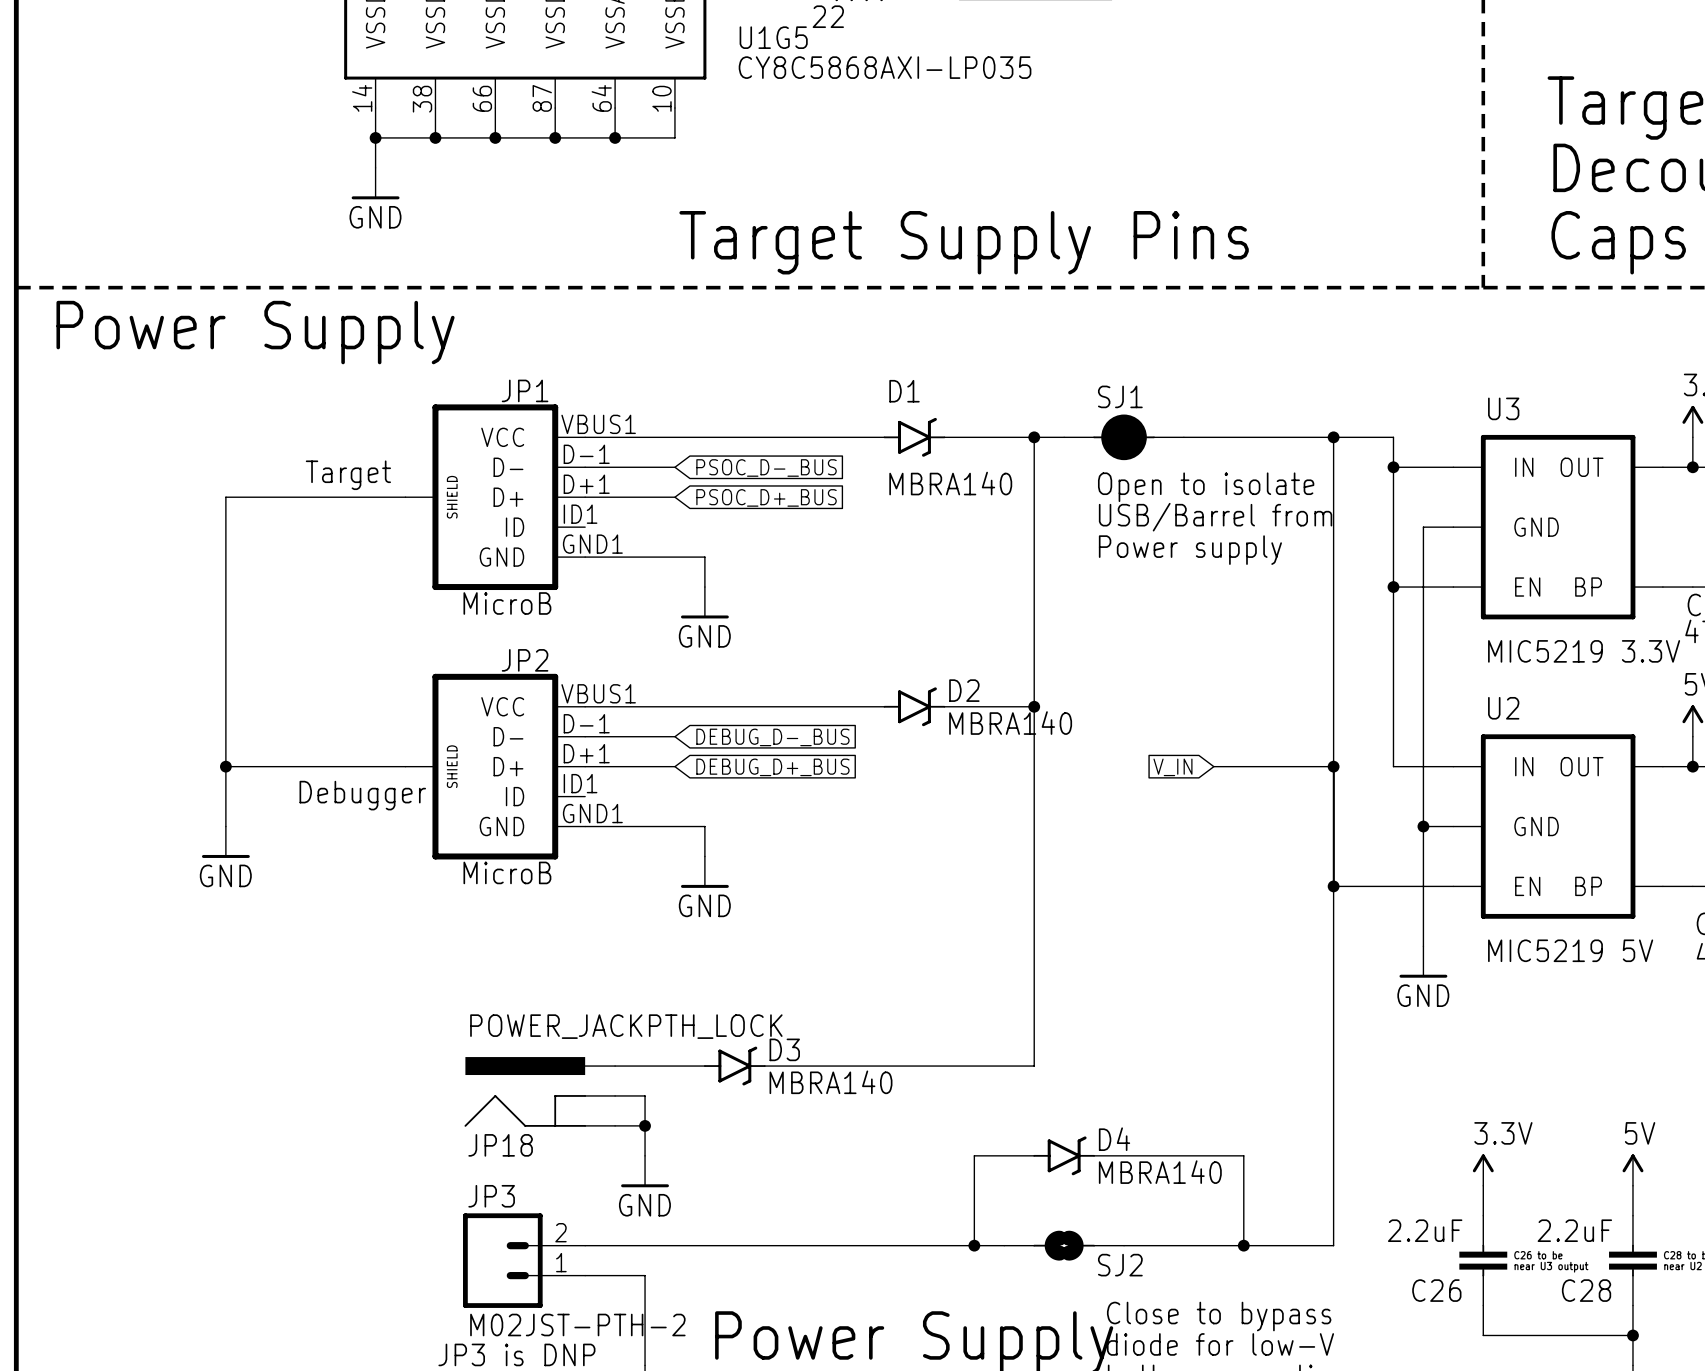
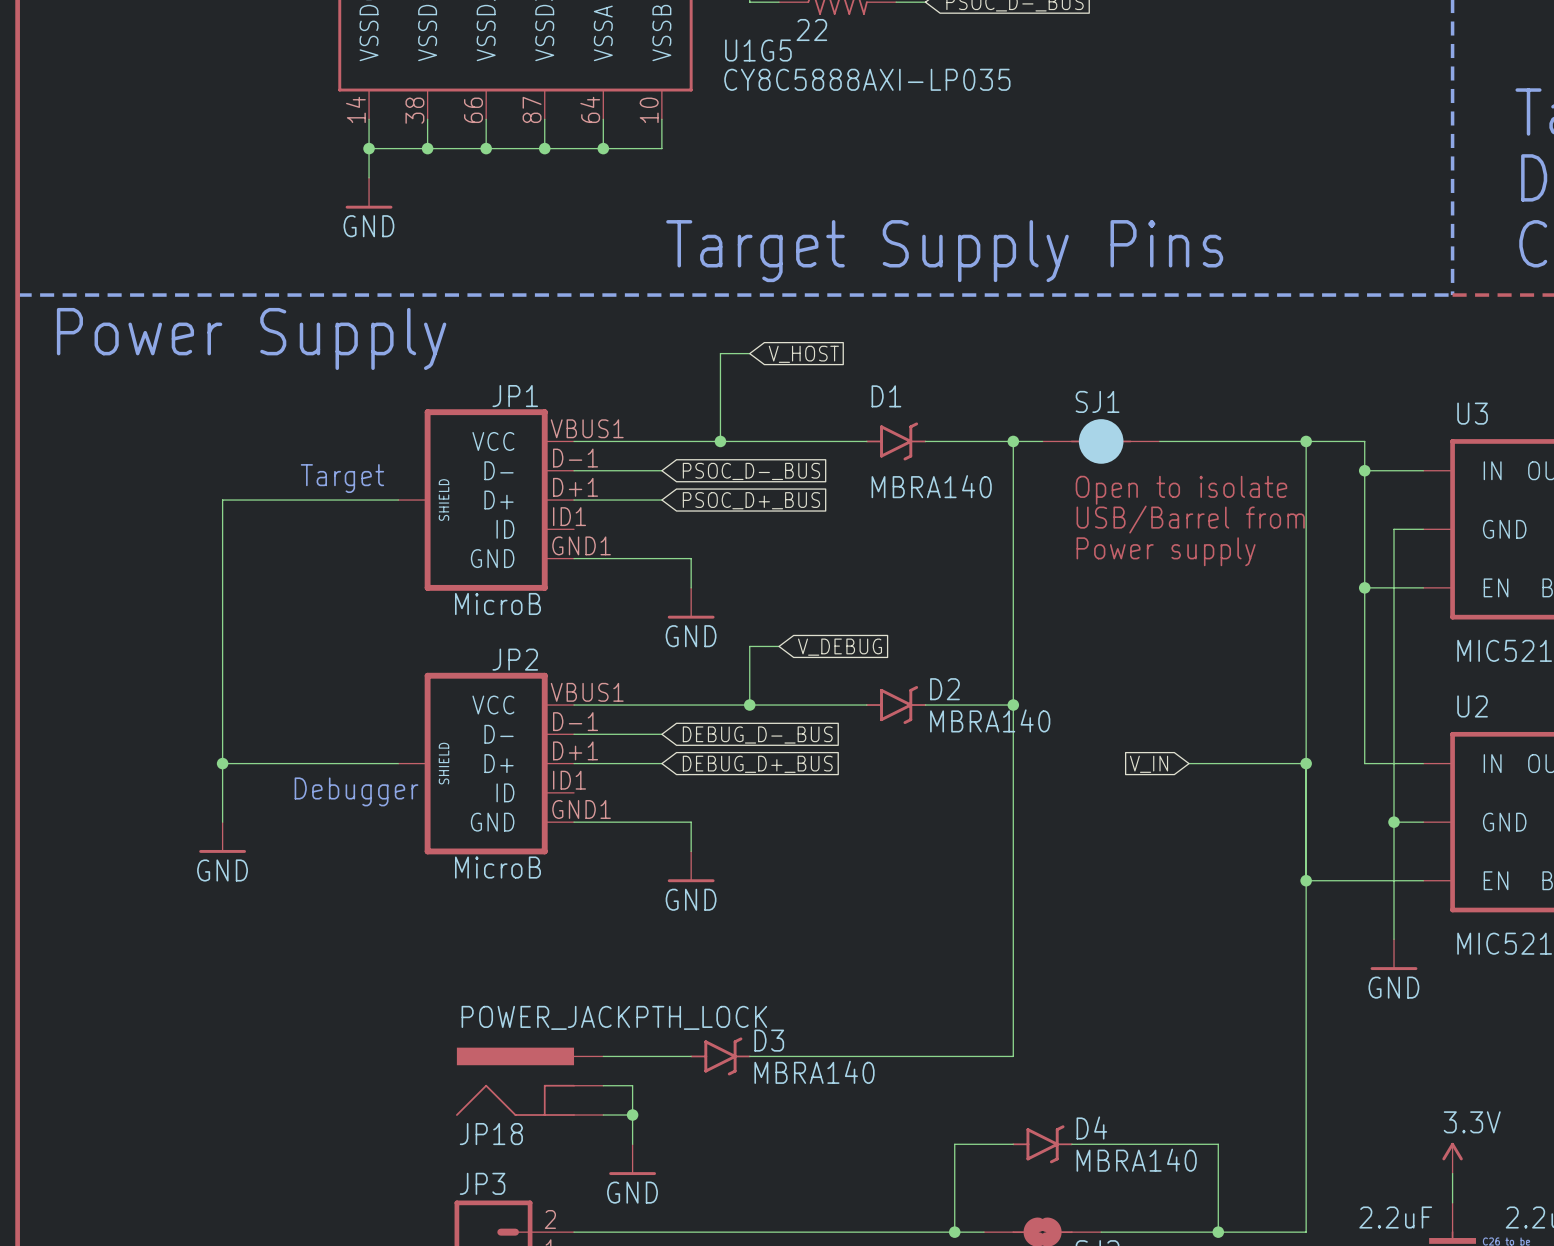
U1G5 value: CY8C5868AXI-LP035 (885, 67) -> CY8C5888AXI-LP035 (867, 79)
wire: none -> (749, 353) (720, 353) (720, 441)
global label: none -> V_HOST (803, 354)
junction: none -> (720, 441)
wire: none -> (779, 646) (749, 646) (749, 705)
global label: none -> V_DEBUG (840, 647)
junction: none -> (749, 705)

